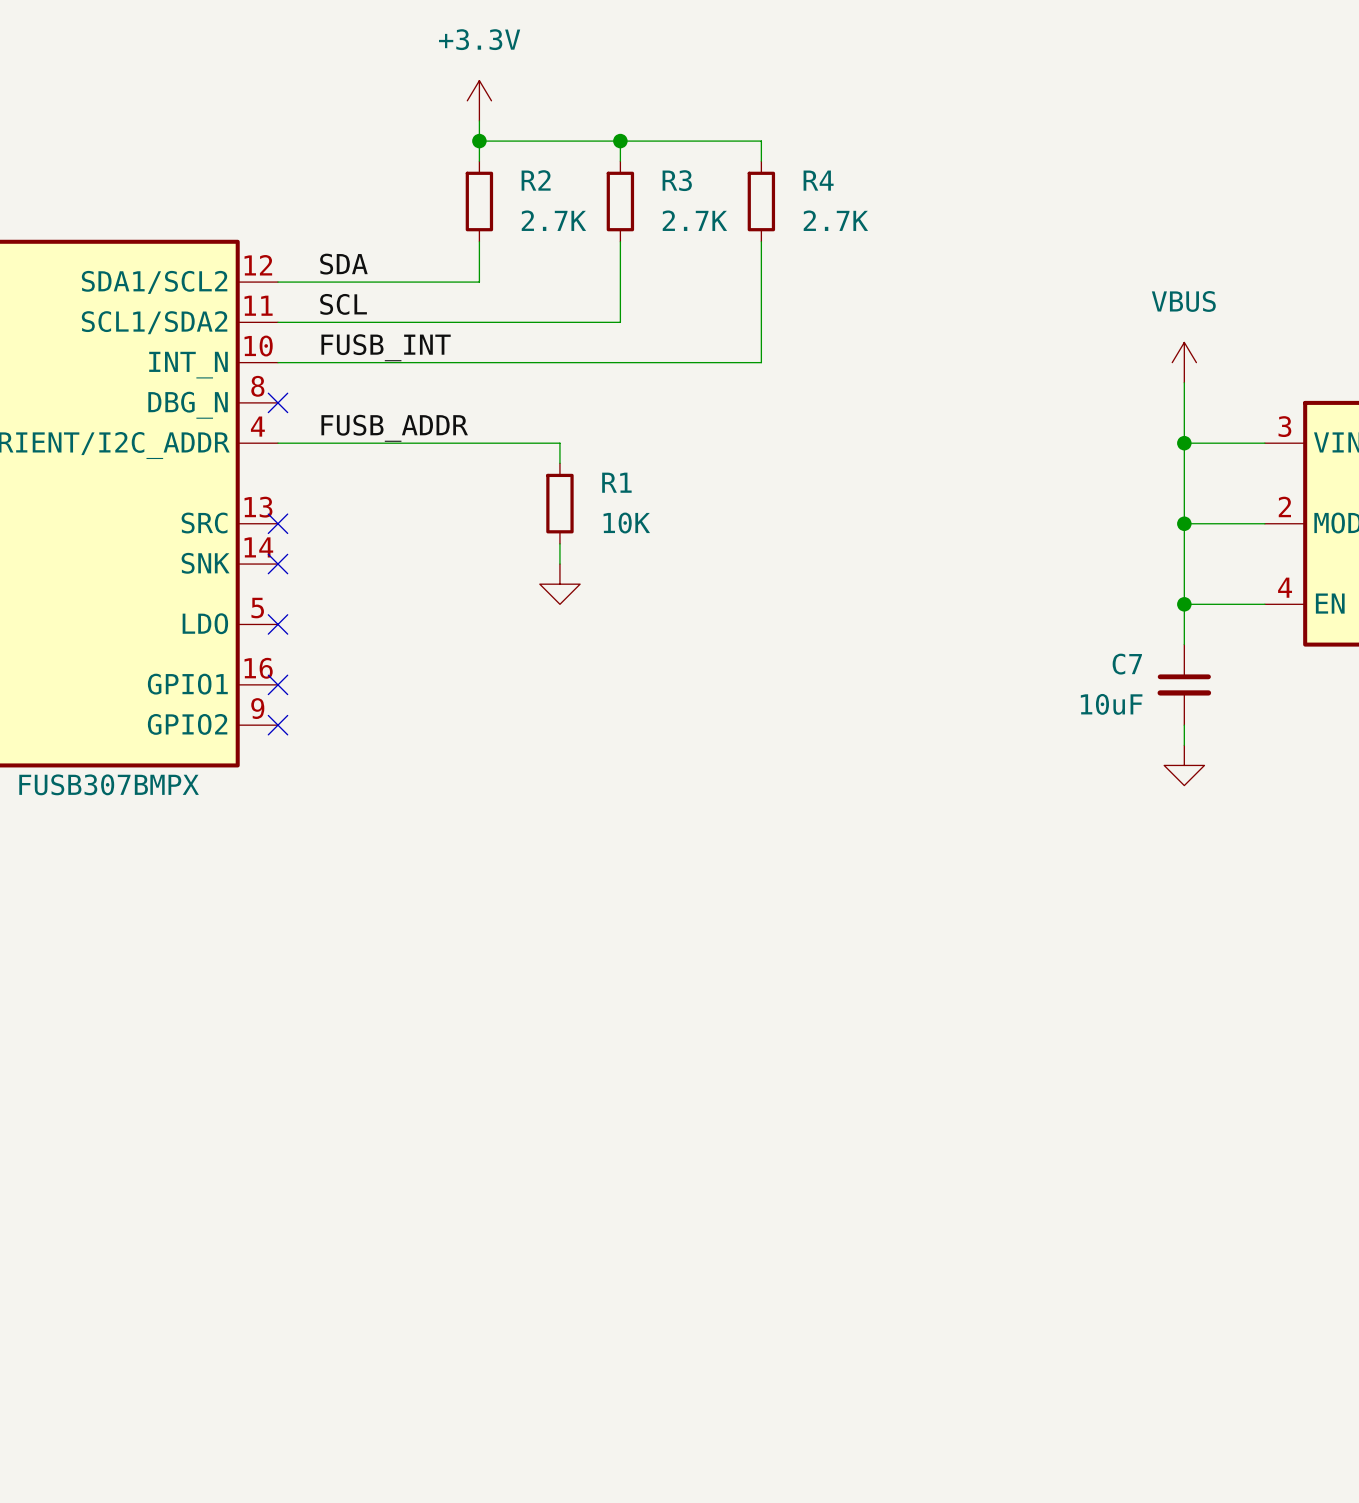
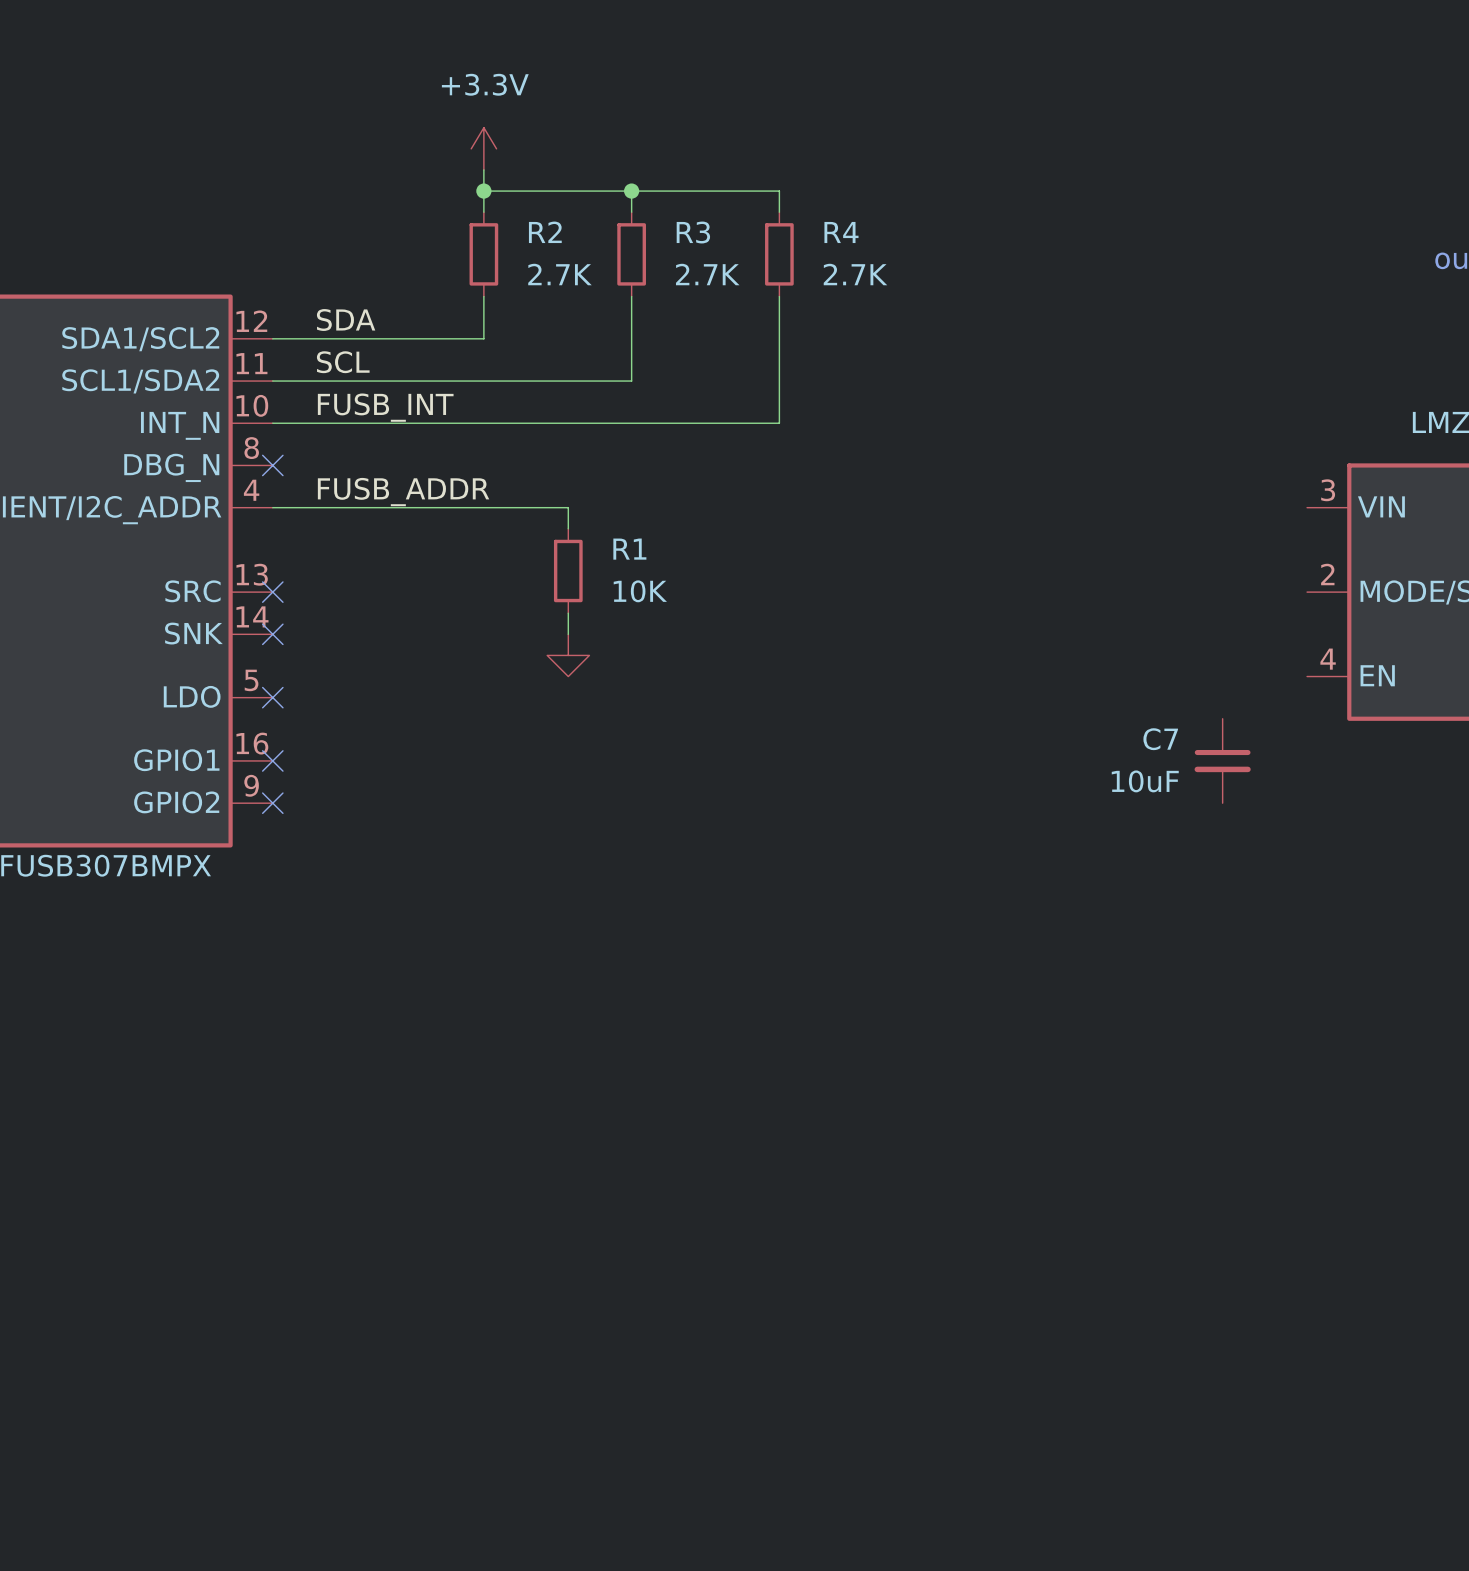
power symbol: VBUS (1184, 362) -> none
wire: (1184, 382) (1184, 644) -> none
wire: (1184, 443) (1264, 443) -> none
junction: (1184, 443) -> none
wire: (1184, 523) (1264, 523) -> none
junction: (1184, 523) -> none
wire: (1184, 604) (1264, 604) -> none
junction: (1184, 604) -> none
wire: (1184, 725) (1184, 745) -> none
power symbol: (1184, 765) -> none

